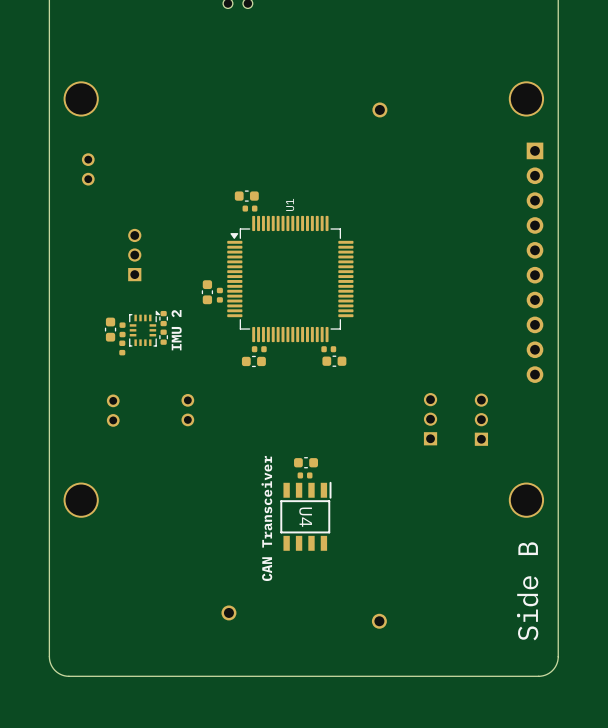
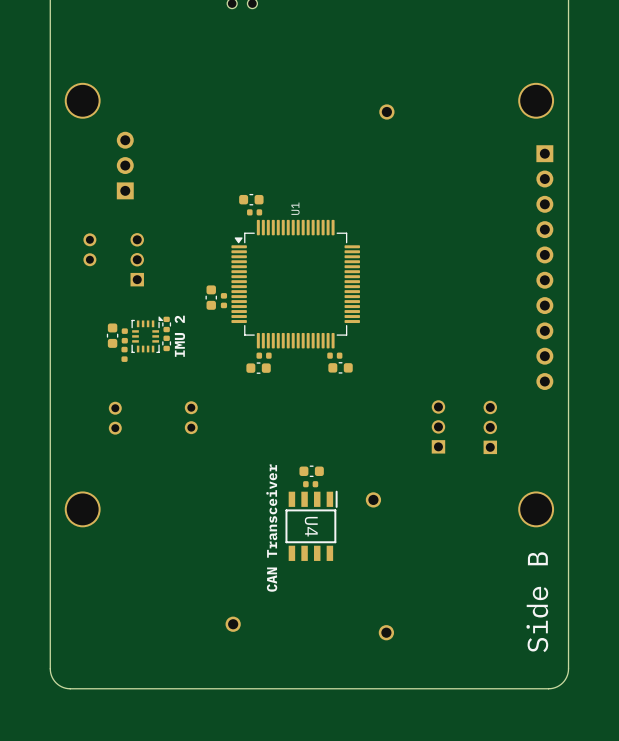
part: none -> (125, 165)
part position: (88, 169) -> (89, 249)
part: none -> (373, 499)

